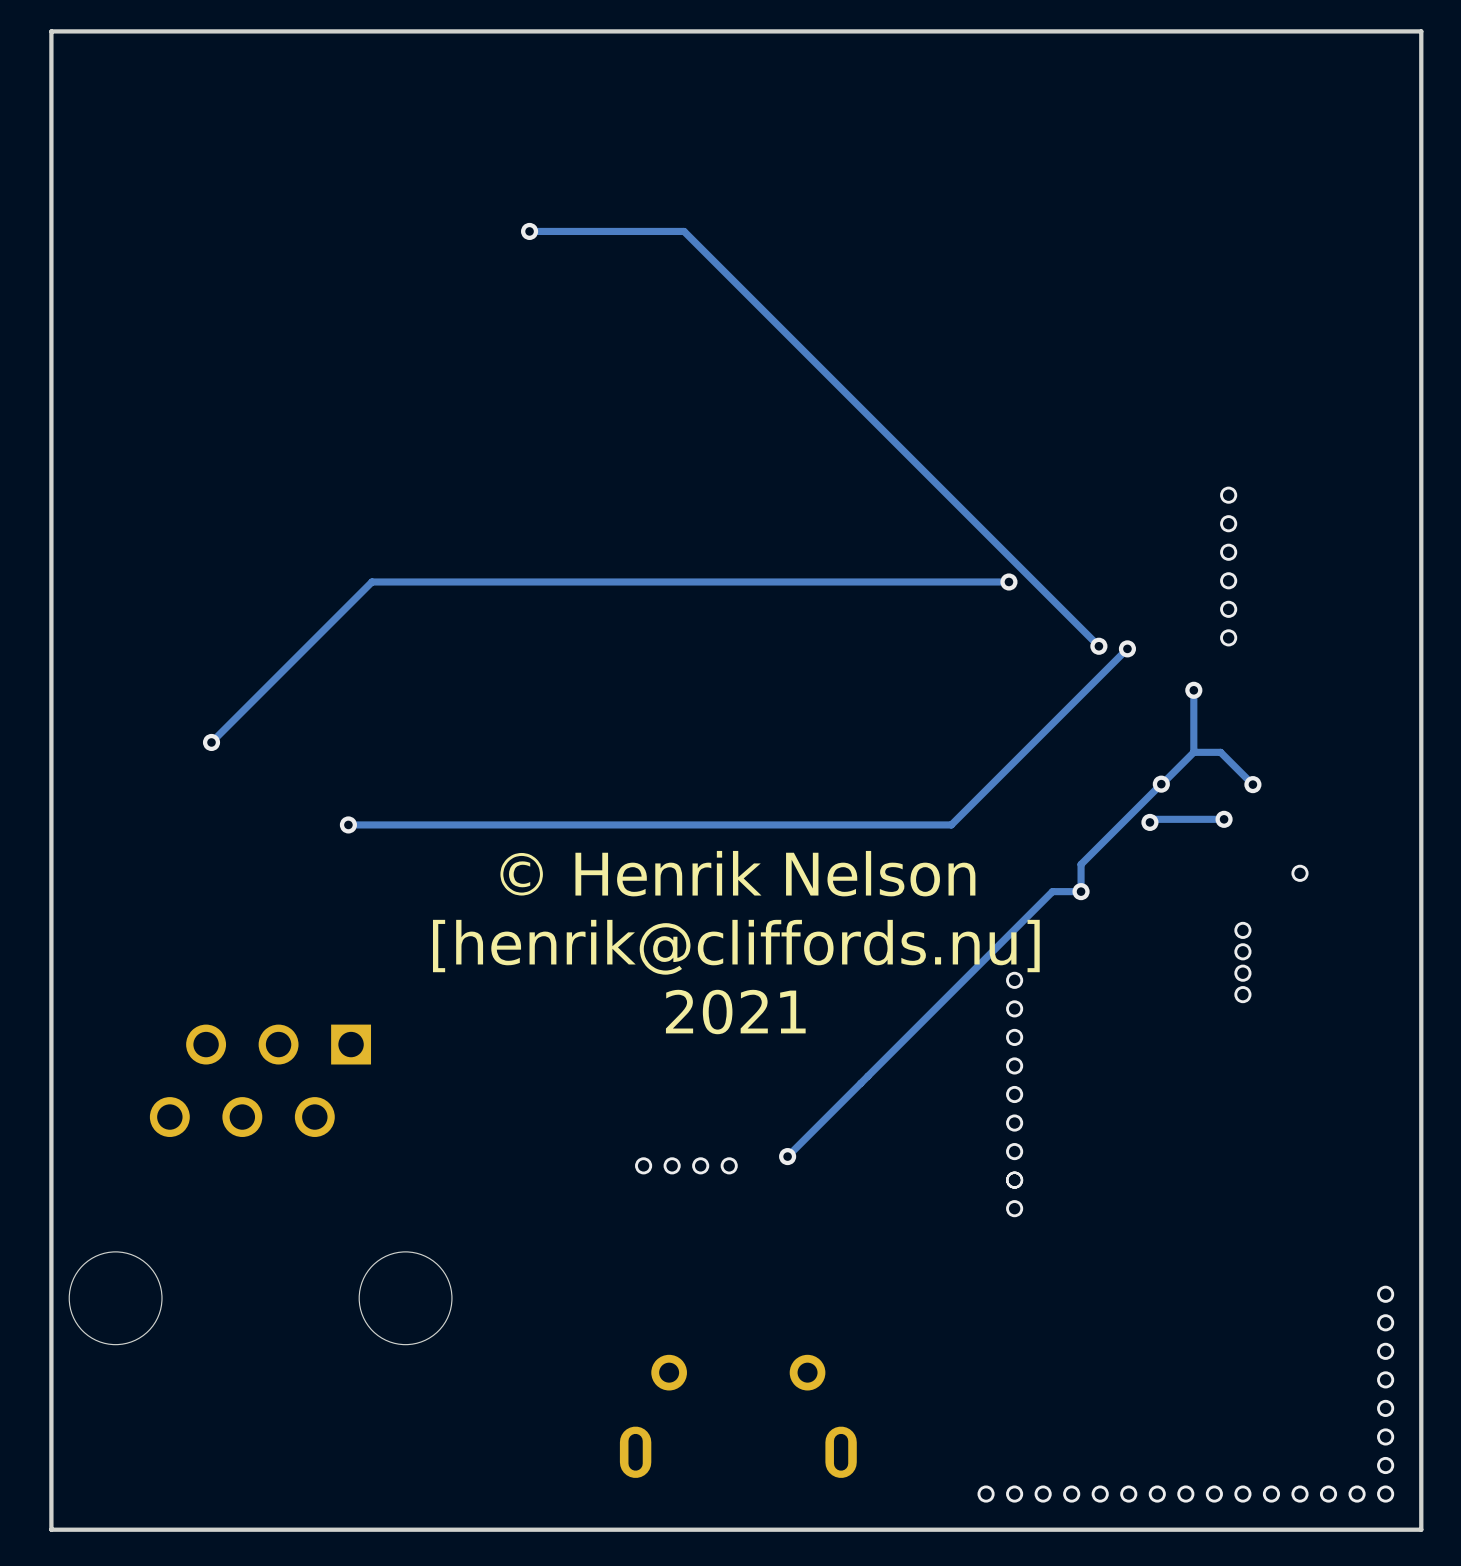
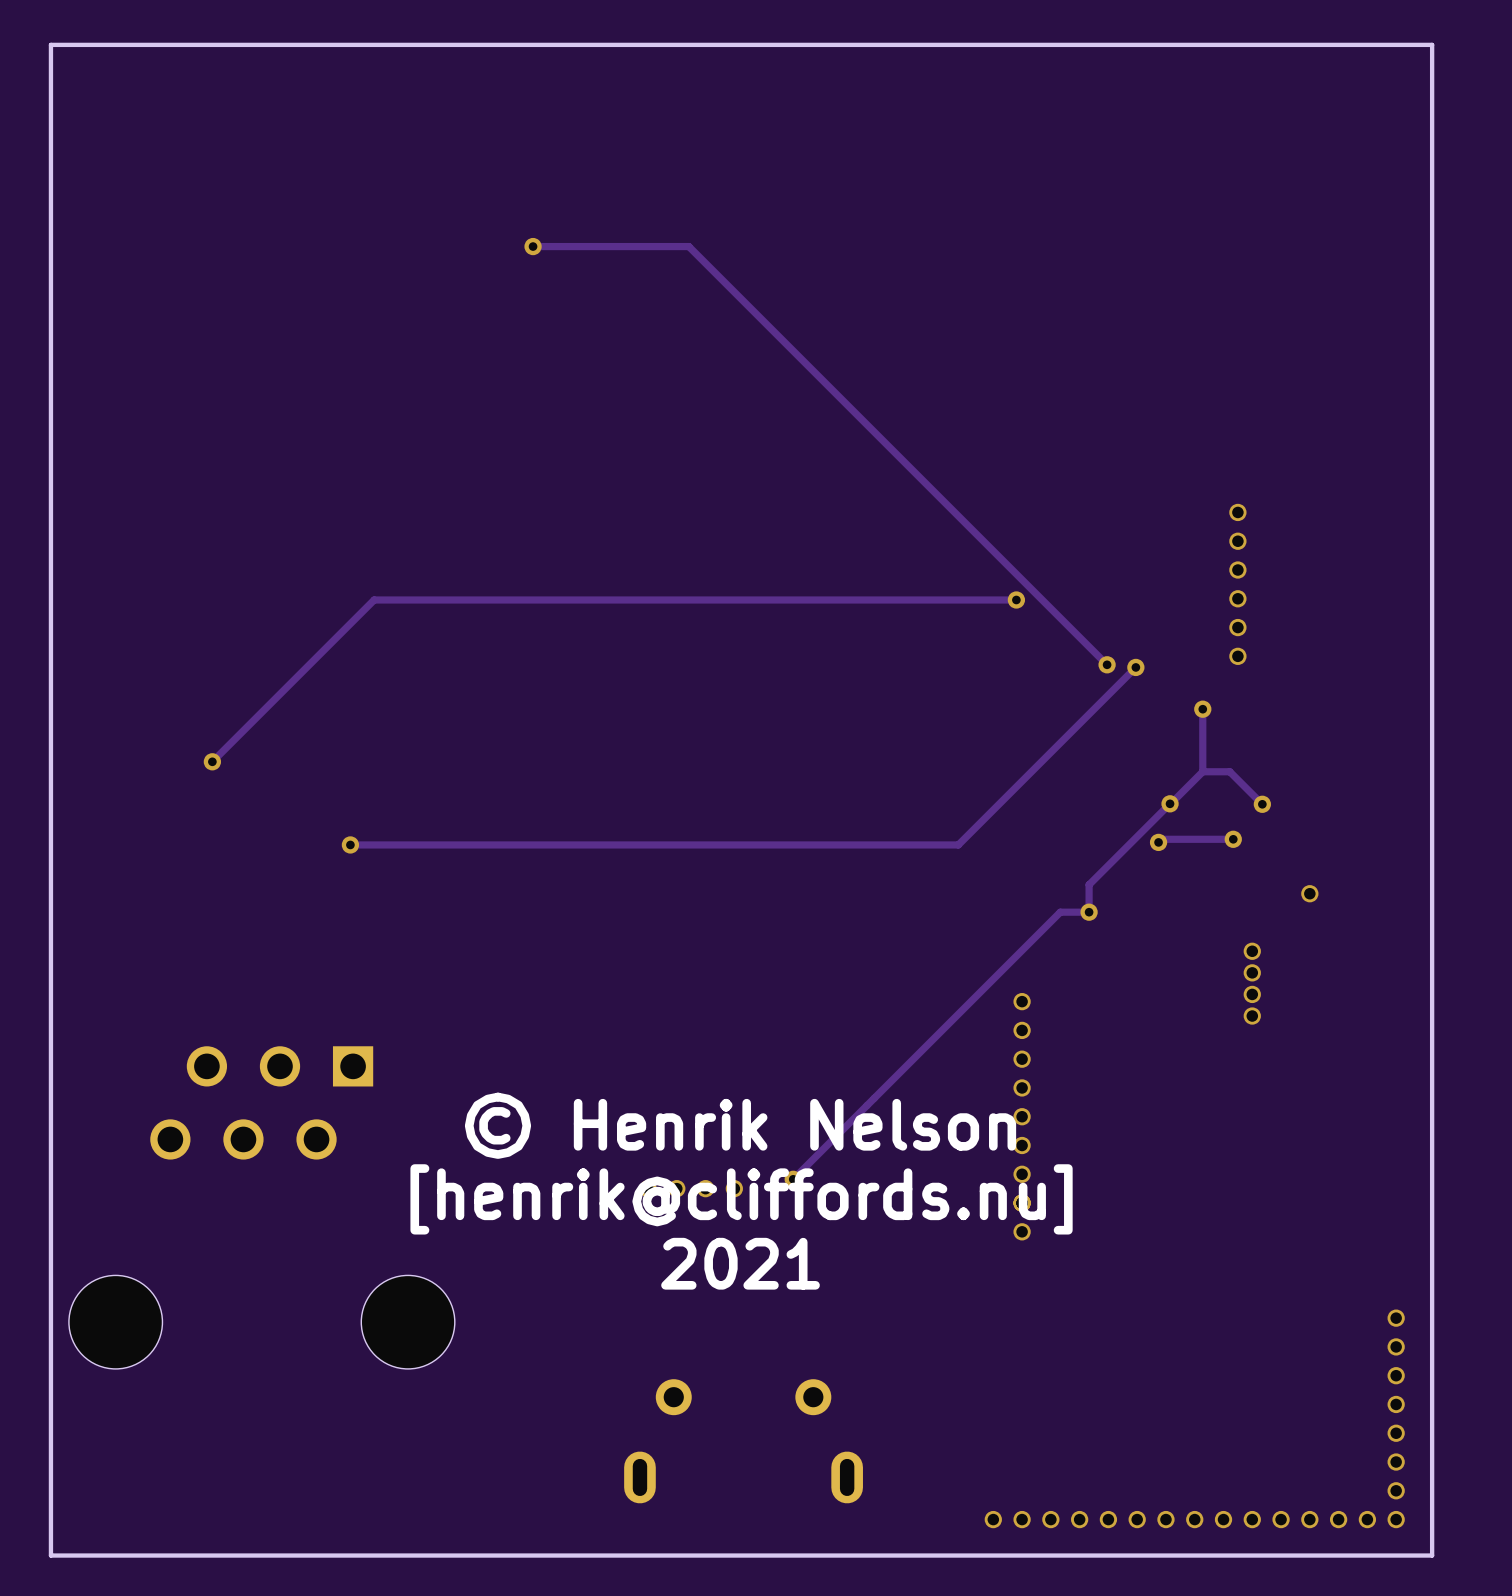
text position: © Henrik Nelson (737, 873) -> © Henrik Nelson (740, 1125)
text position: [henrik@cliffords.nu] (736, 947) -> [henrik@cliffords.nu] (741, 1199)
text position: 2021 (735, 1012) -> 2021 (740, 1263)

